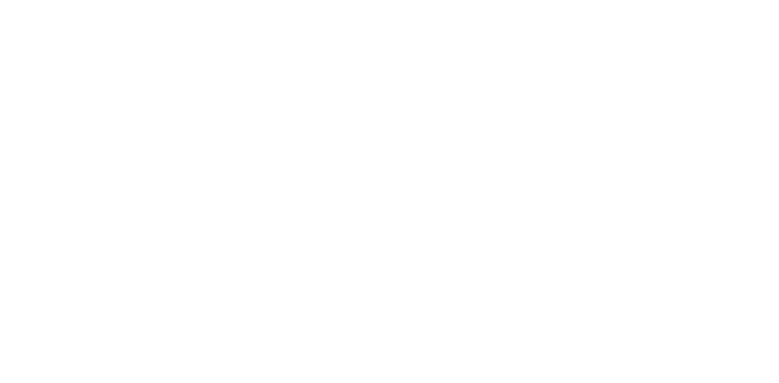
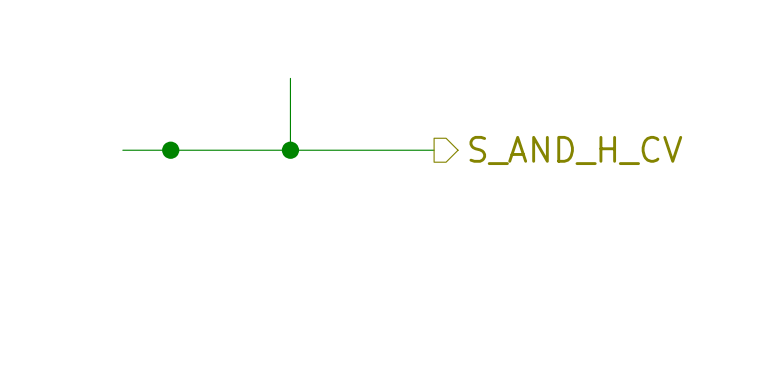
wire: none -> (290, 78) (290, 150)
wire: none -> (122, 150) (434, 150)
junction: none -> (170, 150)
junction: none -> (290, 150)
hierarchical label: none -> S_AND_H_CV (575, 150)

